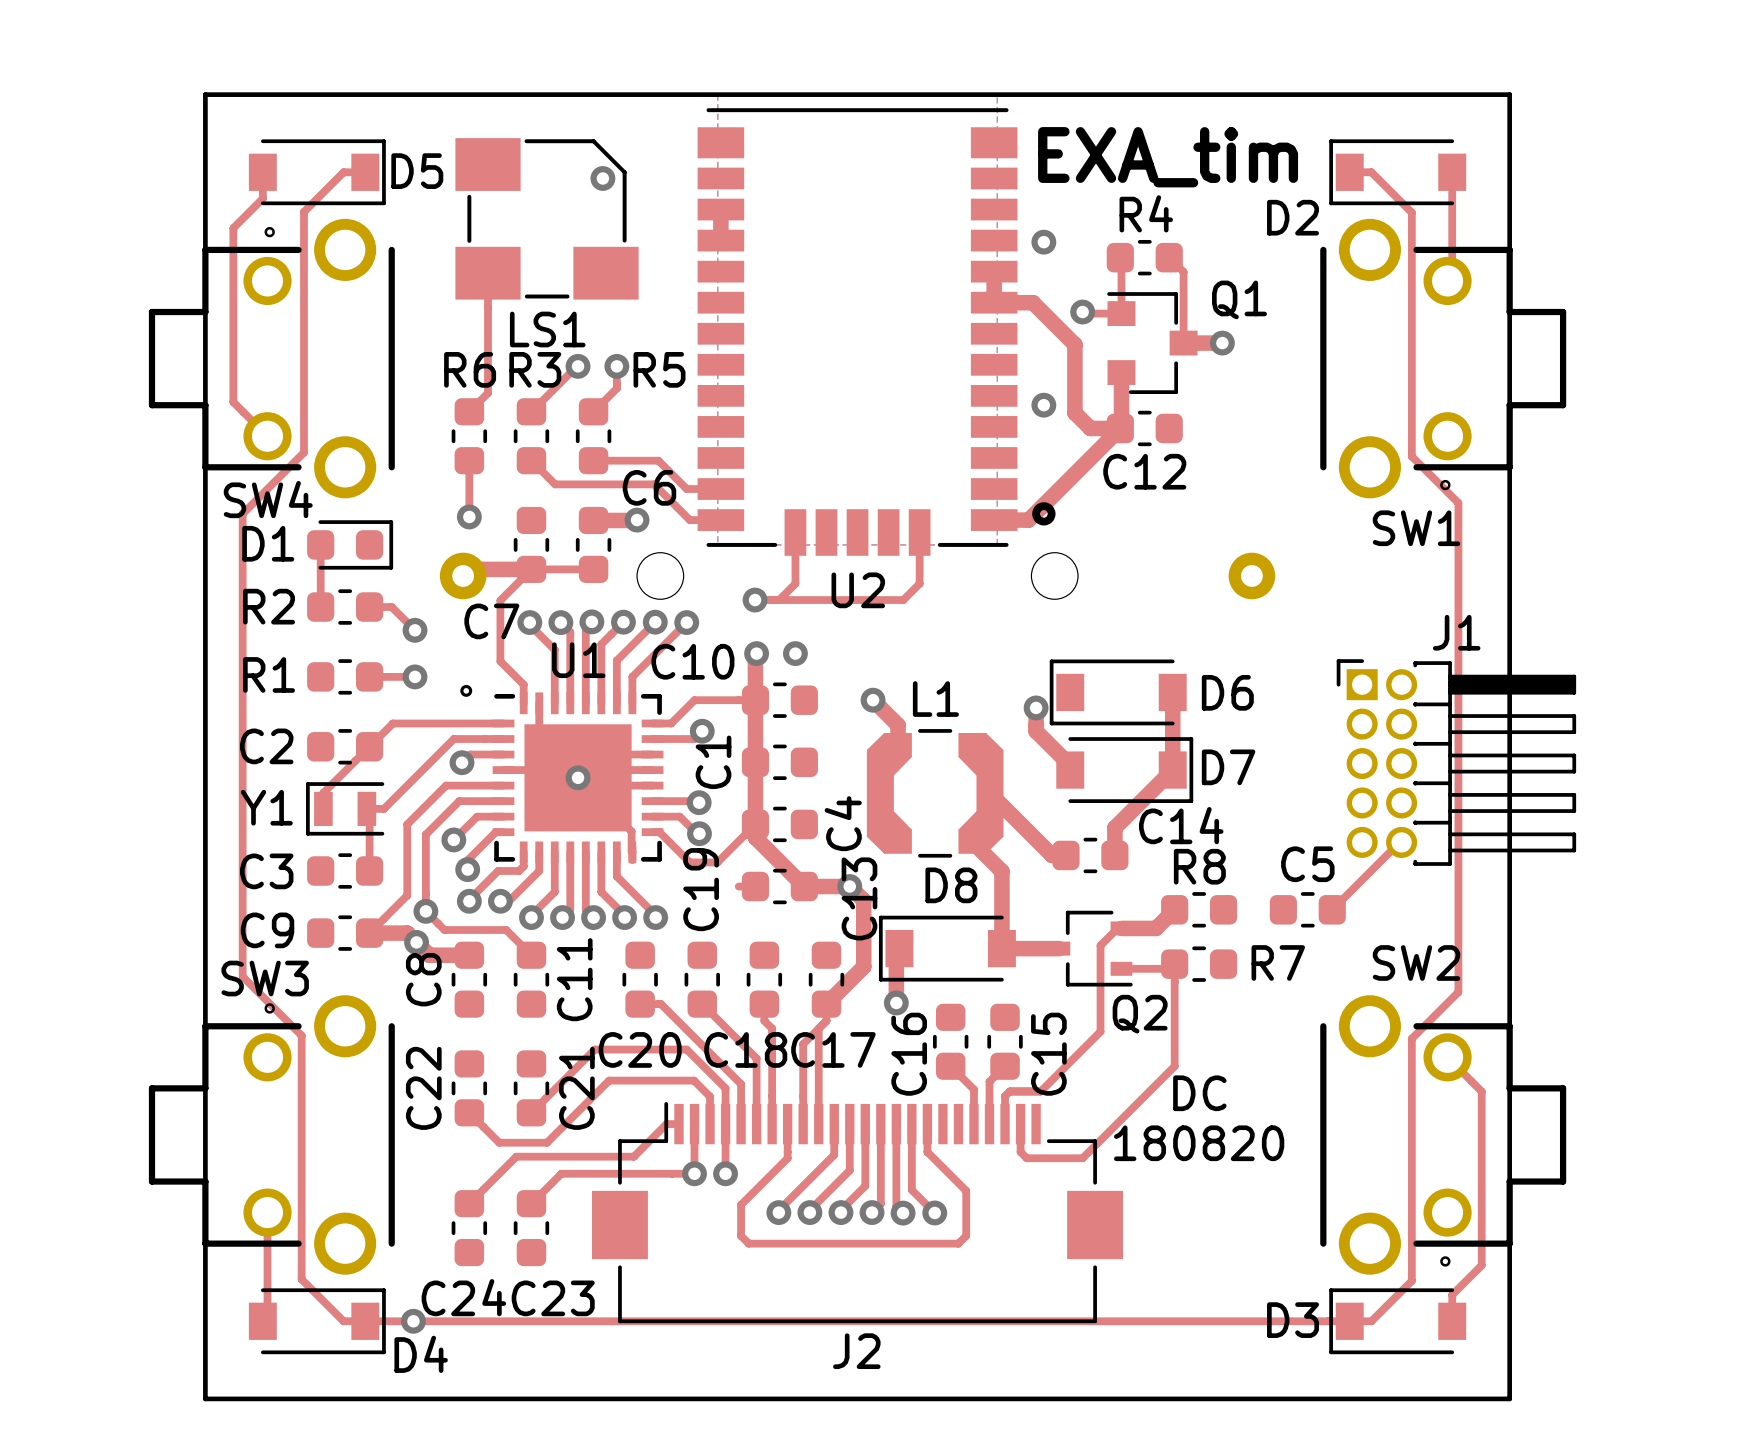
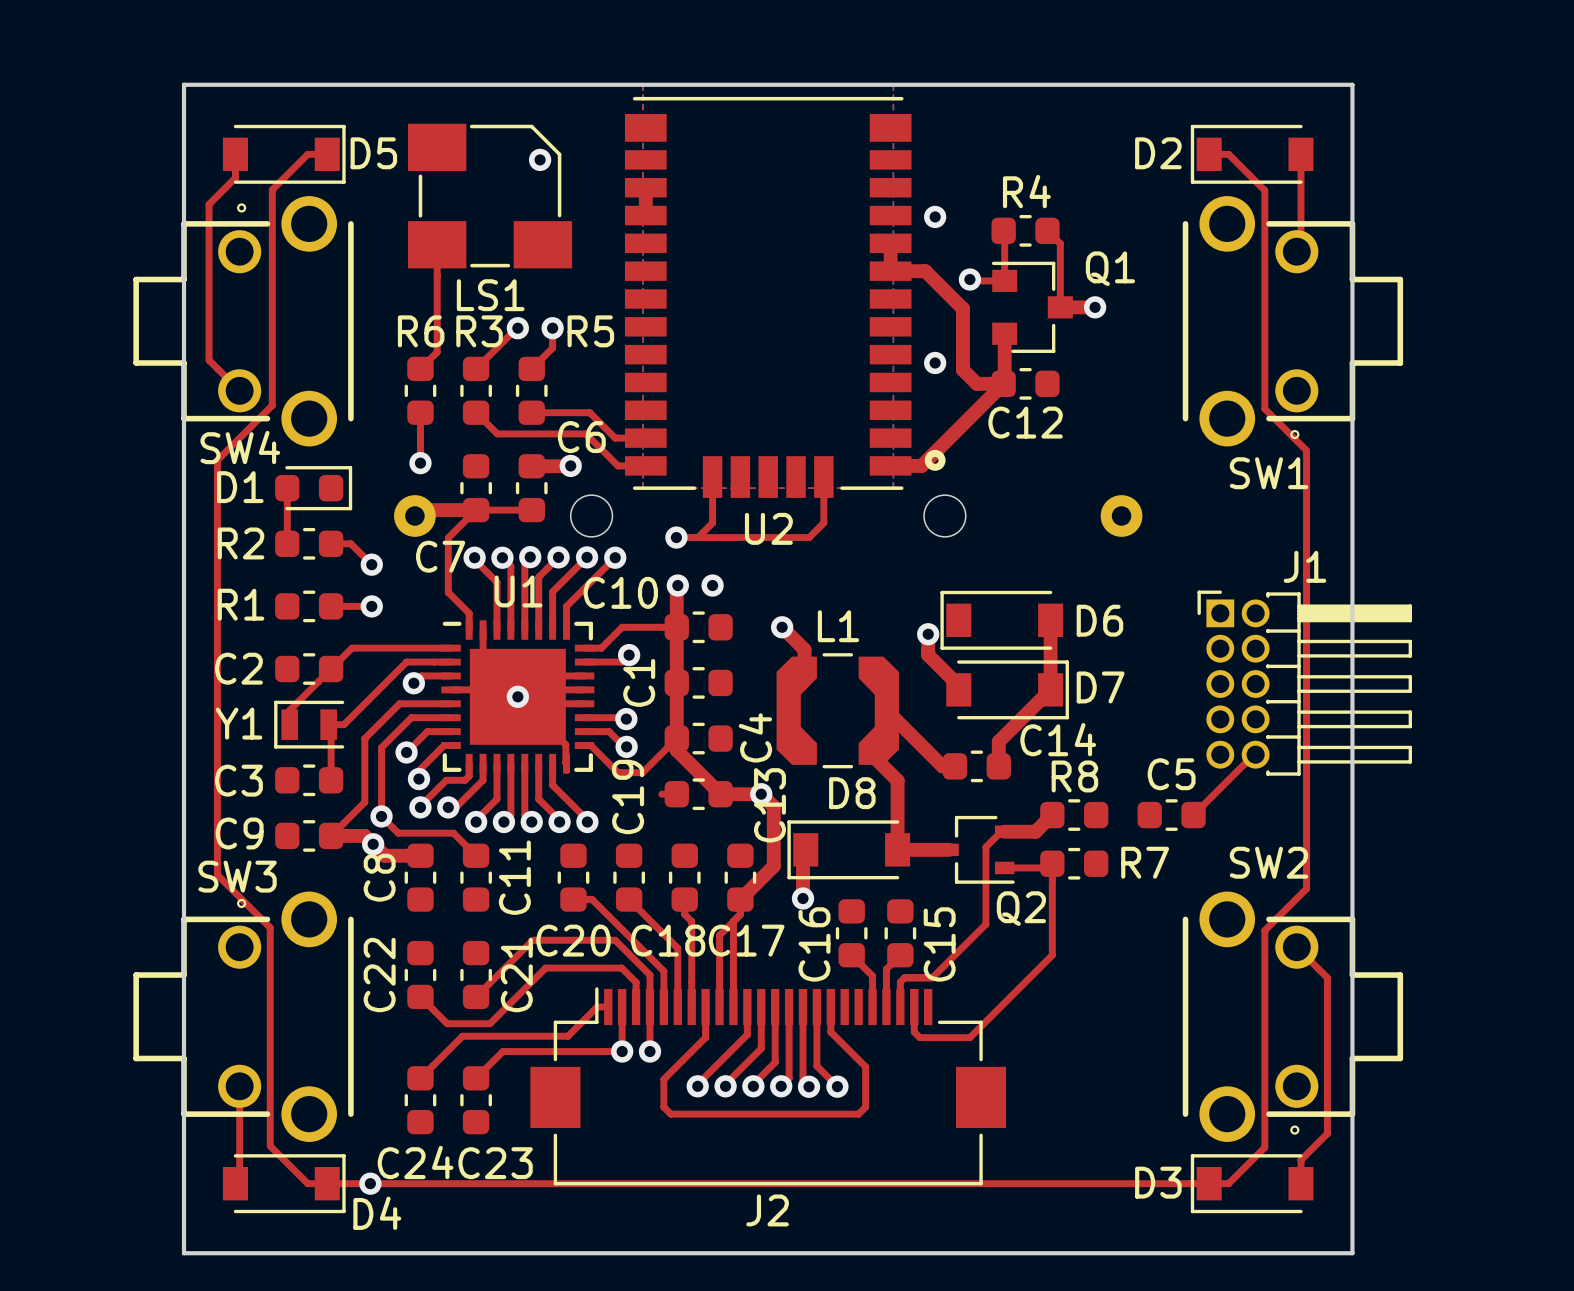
text: EXA_tim (1168, 157) -> none
D2 name position: D2 (1293, 217) -> D2 (1158, 153)
U1 footprint: [460, 684, 664, 864] -> [441, 620, 595, 774]
text: DC (1199, 1093) -> none
text: 180820 (1199, 1143) -> none

